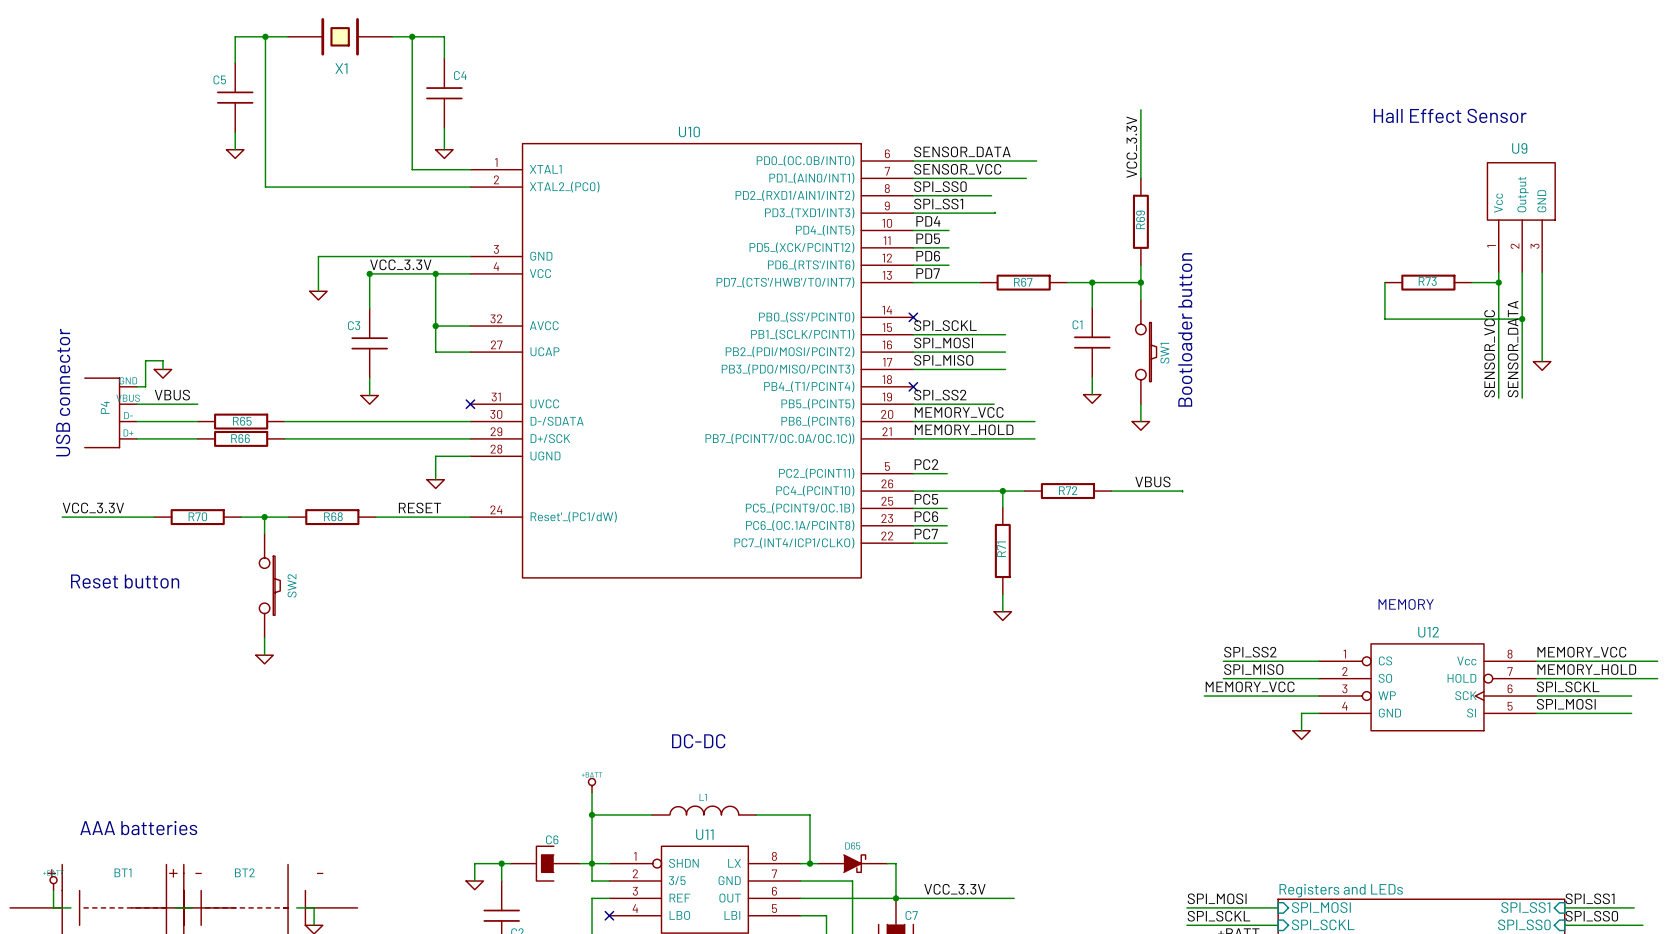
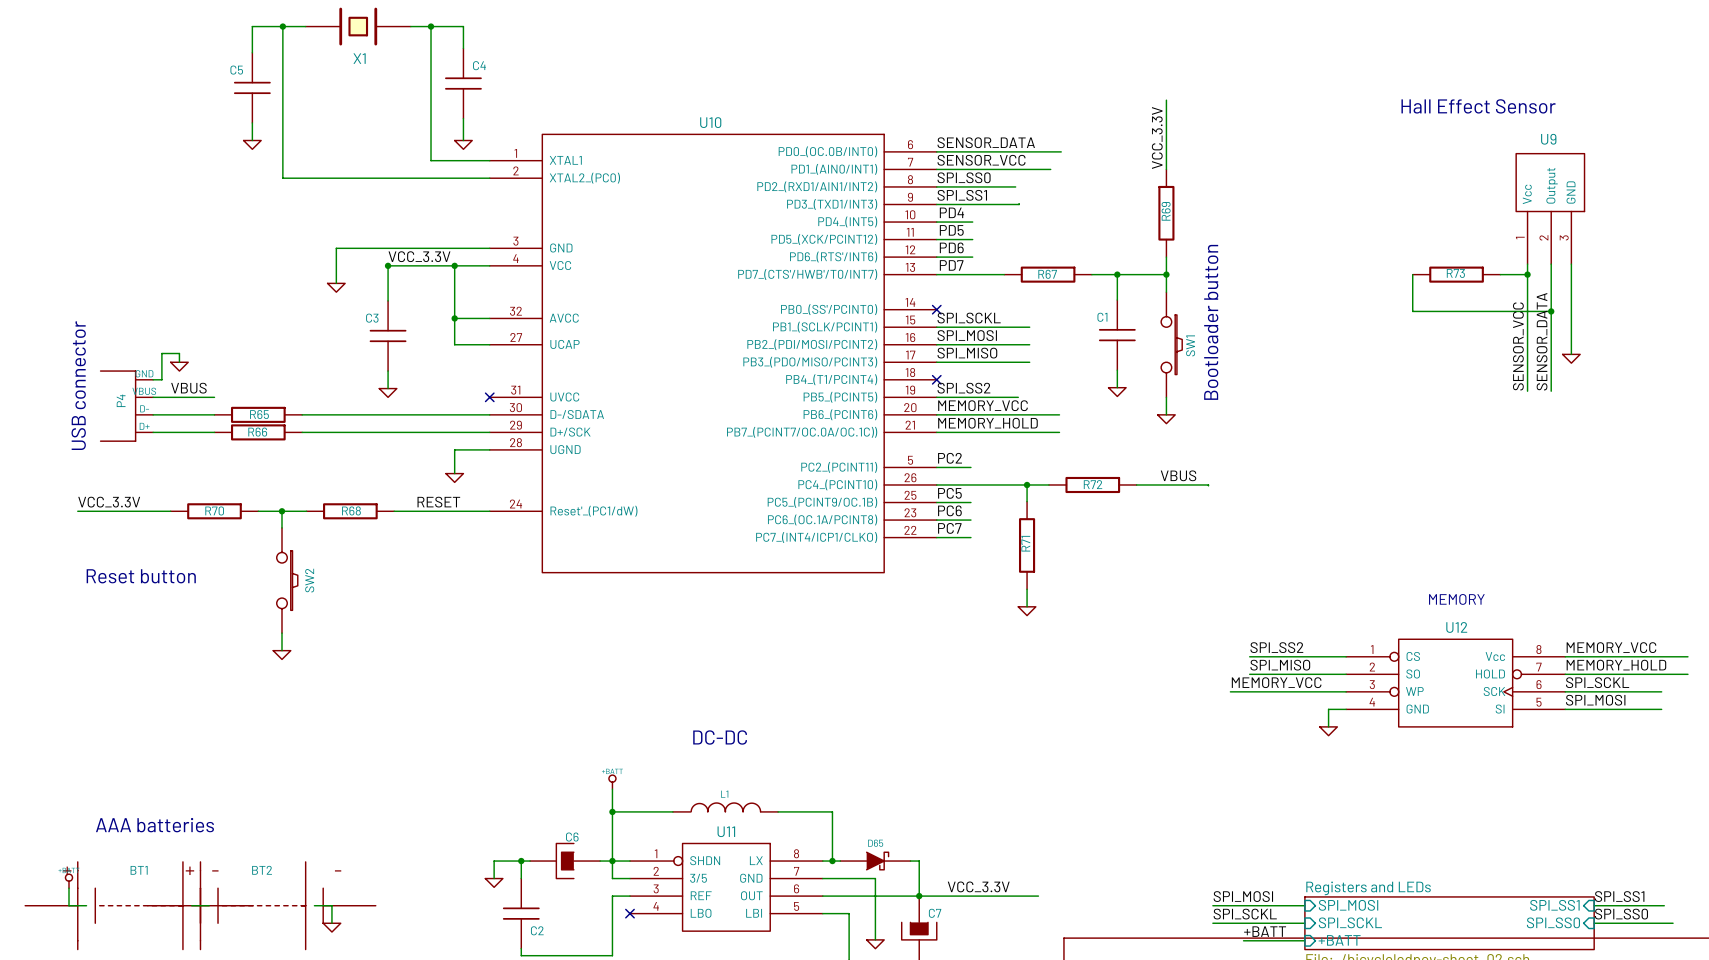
text position: MEMORY (1406, 604) -> MEMORY (1456, 599)

